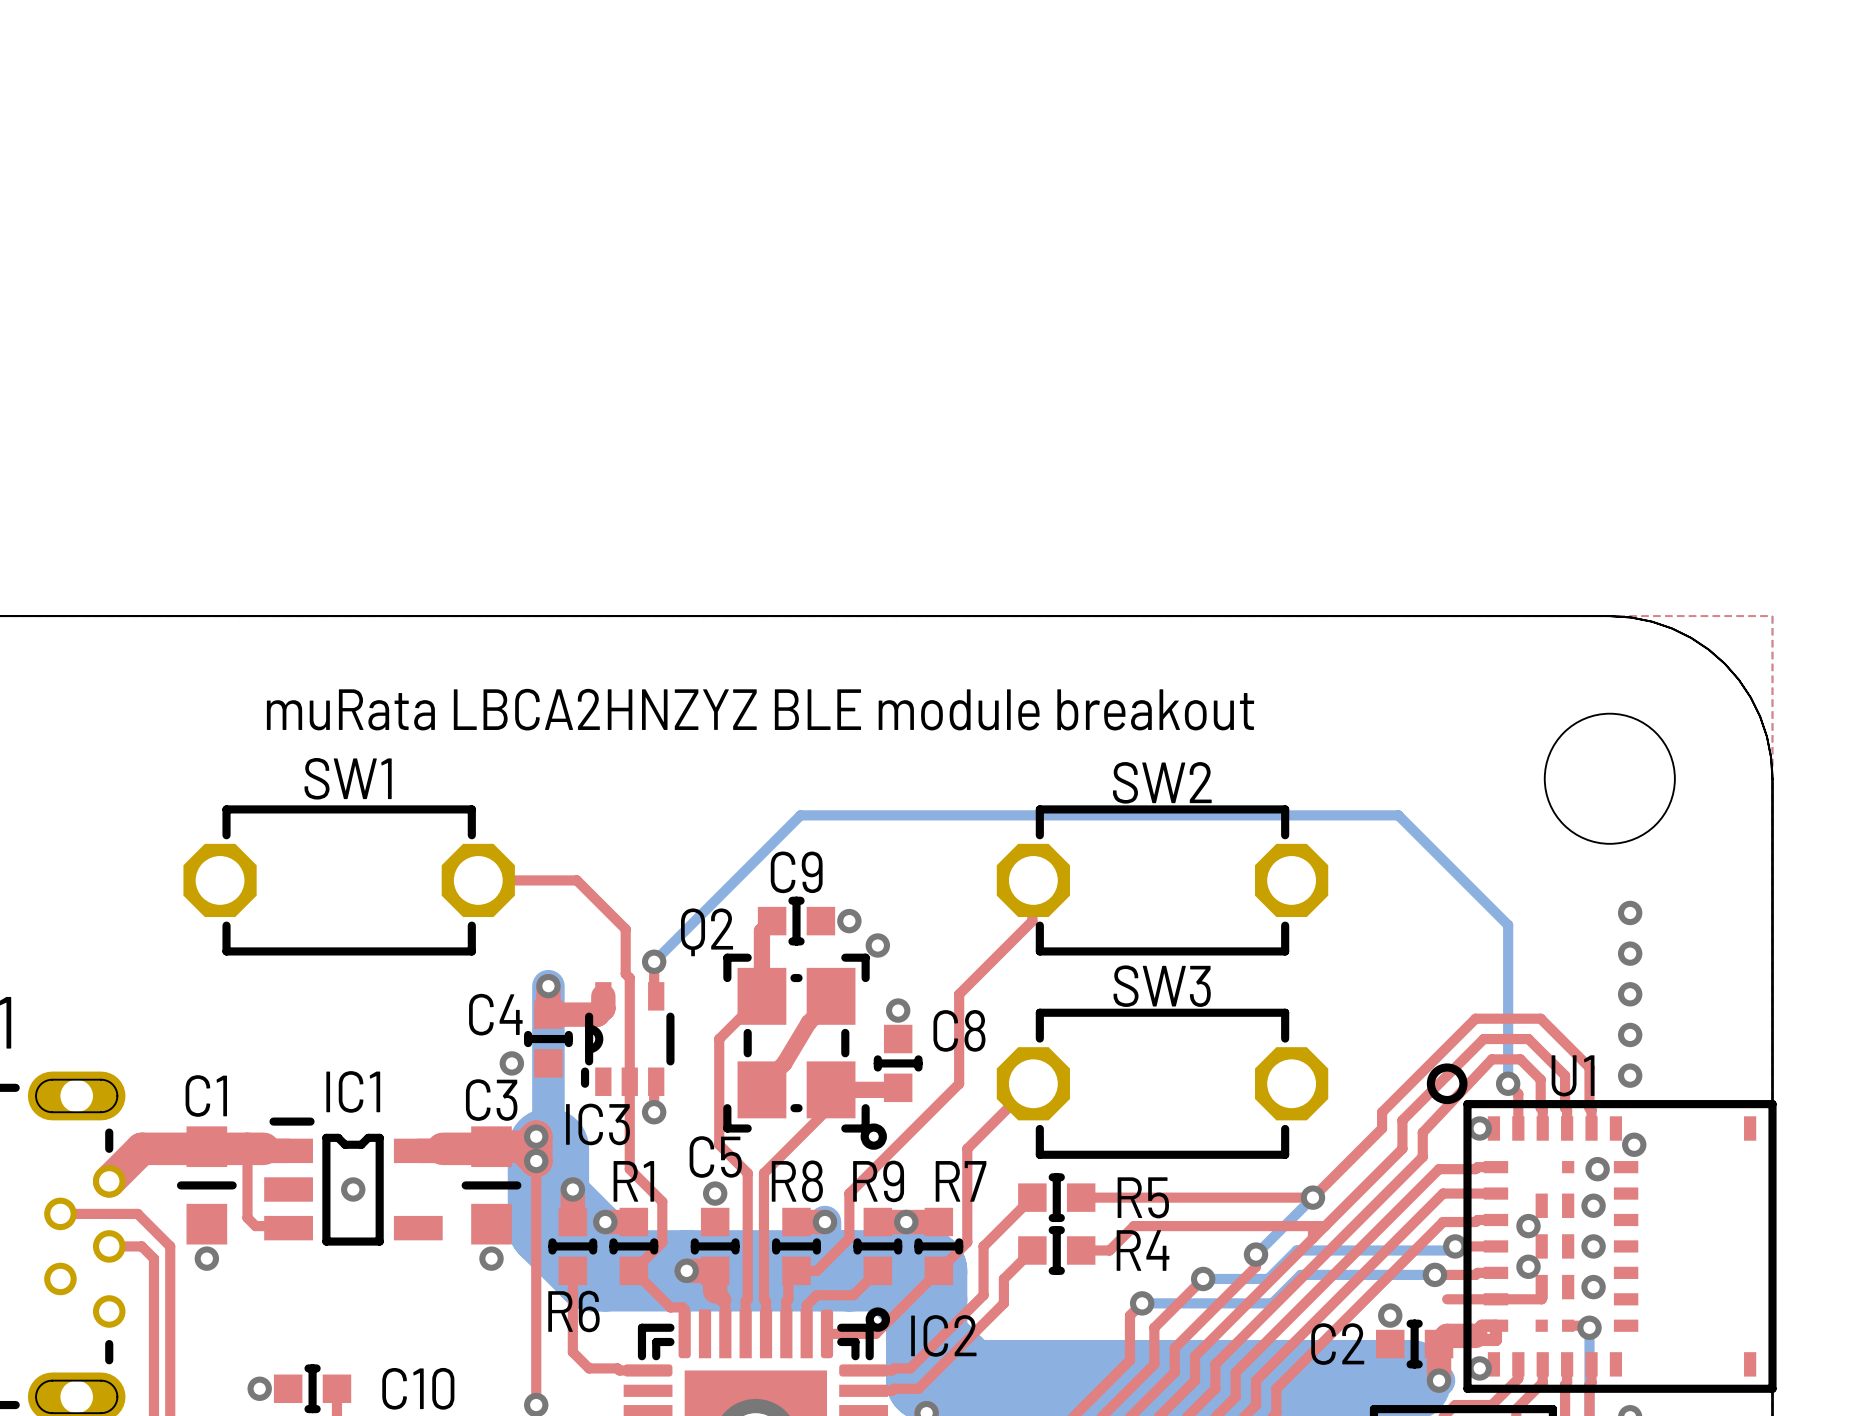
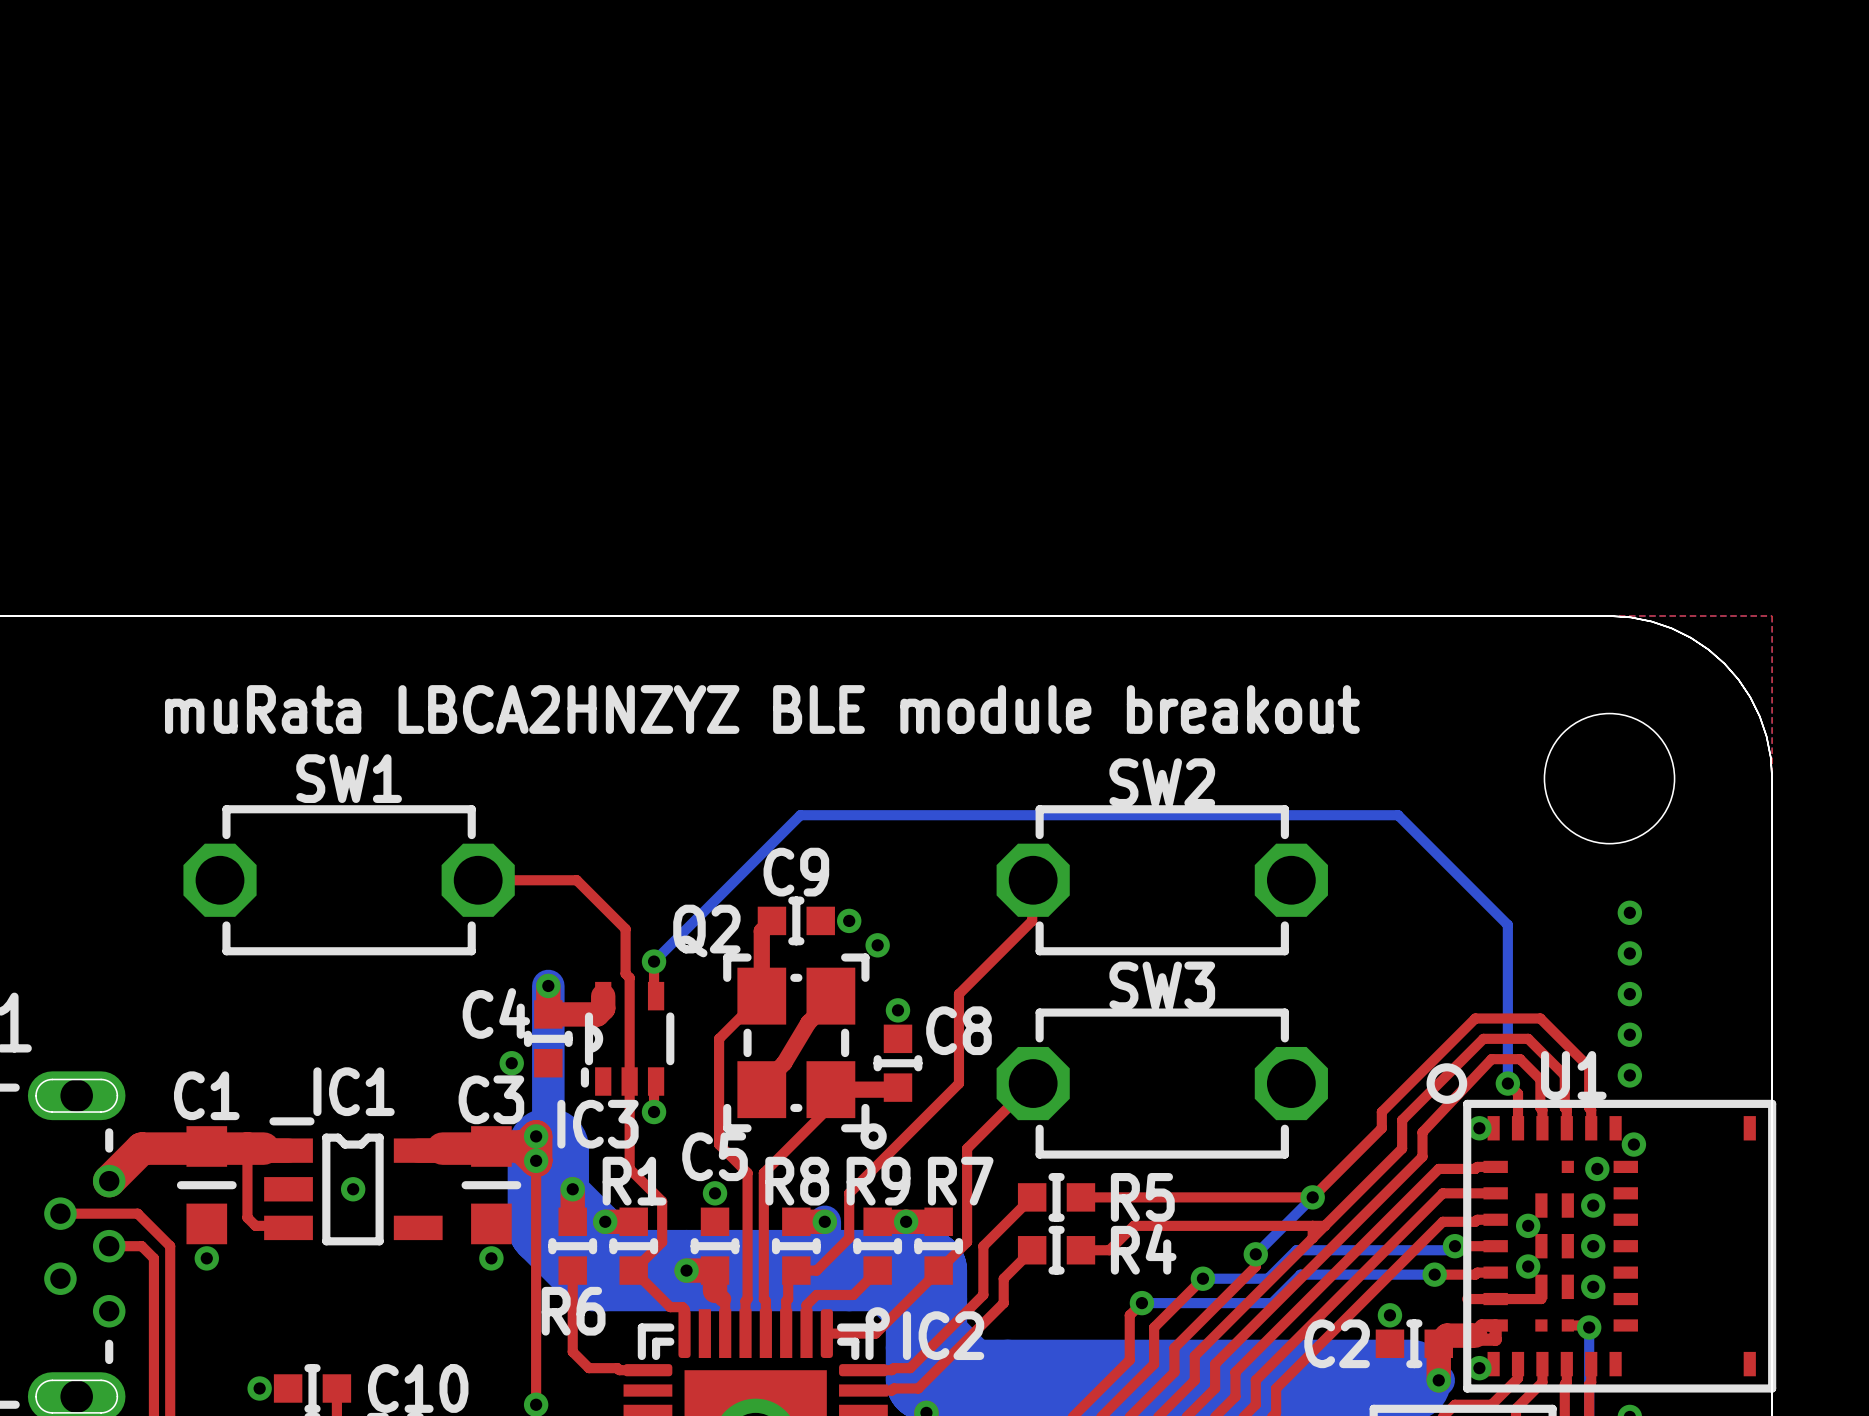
top track: (1447, 1299) (1467, 1299) -> none

